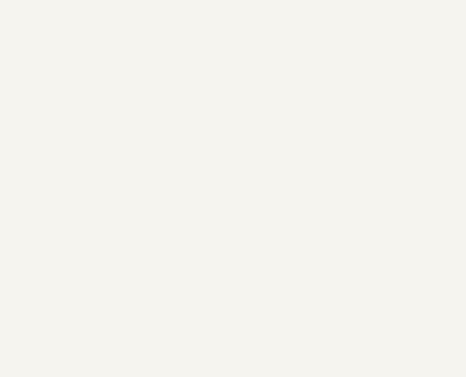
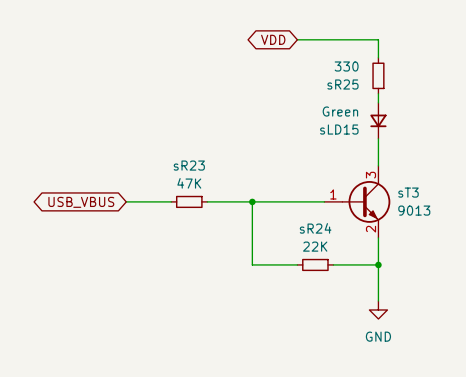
global label: none -> VDD (273, 39)
wire: none -> (297, 39) (378, 39) (378, 57)
sR25: none -> 330 (378, 75)
wire: none -> (378, 93) (378, 102)
sLD15: none -> Green (378, 120)
wire: none -> (378, 138) (378, 165)
wire: none -> (126, 201) (171, 201)
sR23: none -> 47K (189, 201)
wire: none -> (207, 201) (324, 201)
wire: none -> (252, 201) (252, 264) (297, 264)
junction: none -> (252, 201)
sT3: none -> 9013 (357, 201)
global label: none -> USB_VBUS (81, 202)
wire: none -> (378, 237) (378, 300)
sR24: none -> 22K (315, 264)
wire: none -> (333, 264) (378, 264)
junction: none -> (378, 264)
power symbol: none -> GND (378, 309)

